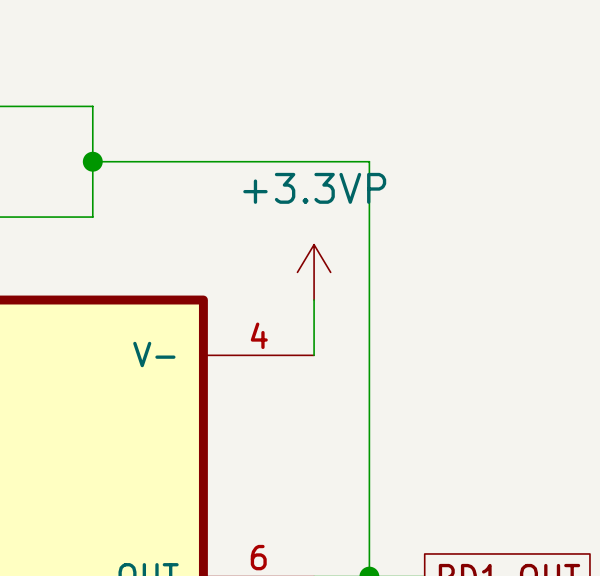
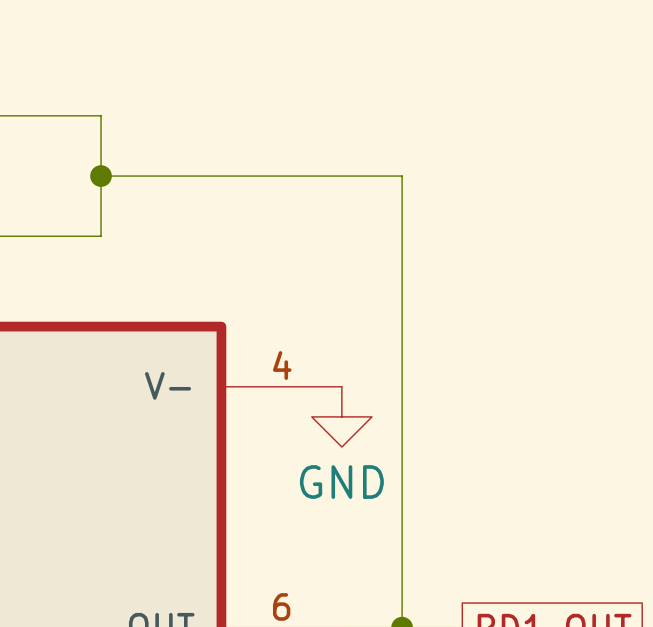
power symbol: +3.3VP (314, 272) -> none
wire: (314, 300) (314, 355) -> none
power symbol: none -> GND (341, 416)

